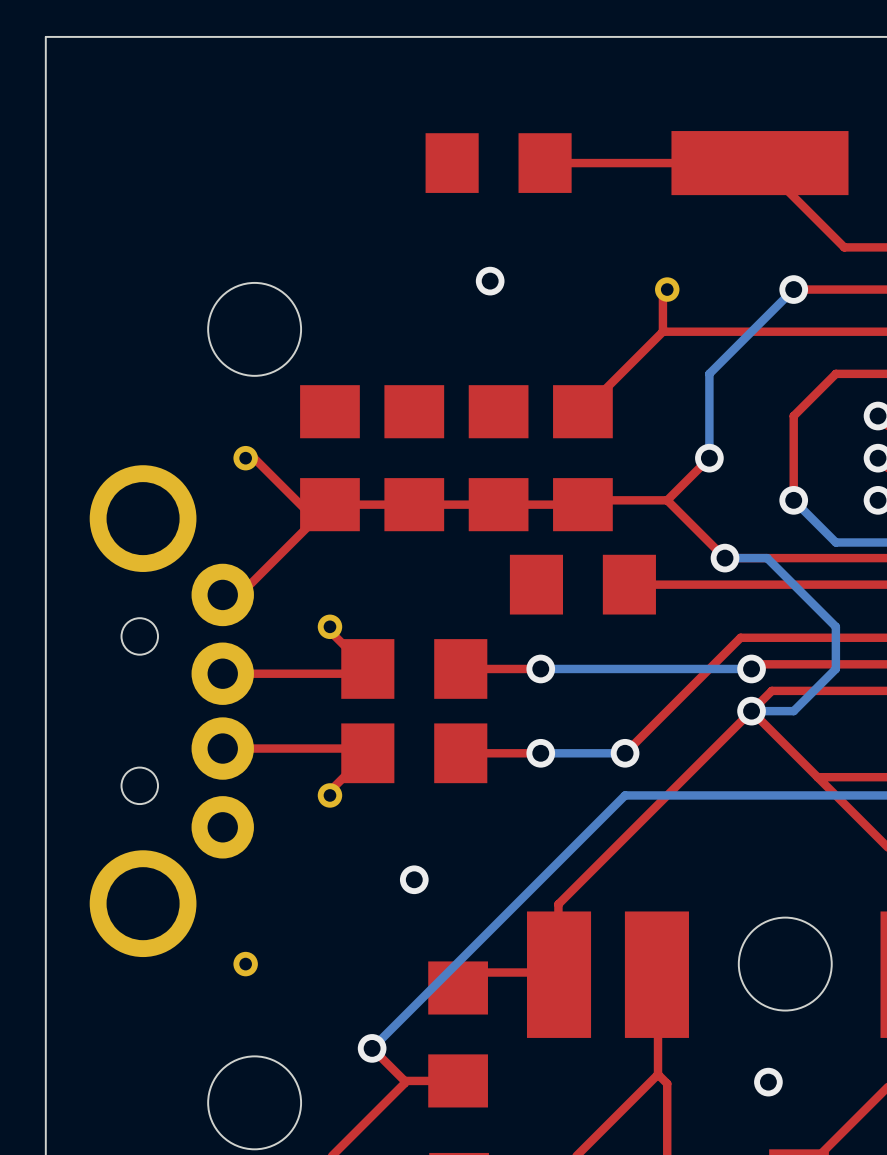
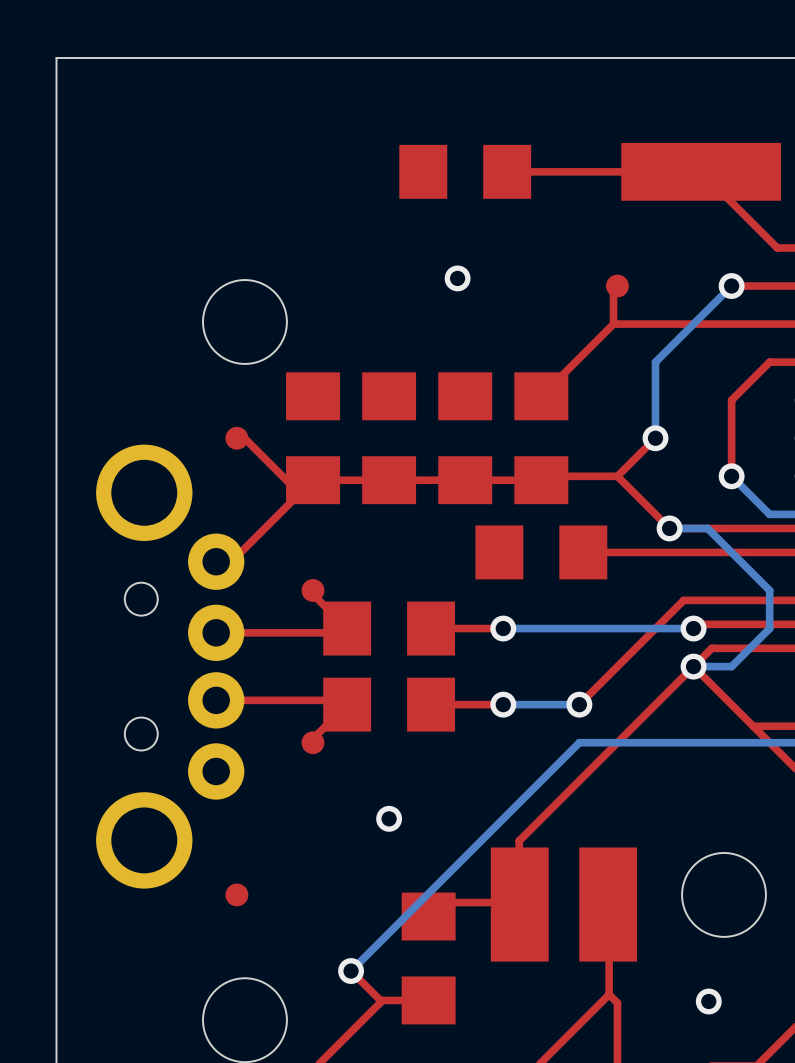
part footprint: [655, 277, 680, 302] -> [606, 274, 629, 298]
part footprint: [233, 445, 258, 471] -> [225, 426, 249, 450]
part footprint: [317, 614, 343, 640] -> [301, 579, 325, 602]
part footprint: [317, 783, 343, 808] -> [301, 731, 325, 755]
part footprint: [233, 951, 258, 977] -> [225, 883, 249, 907]

